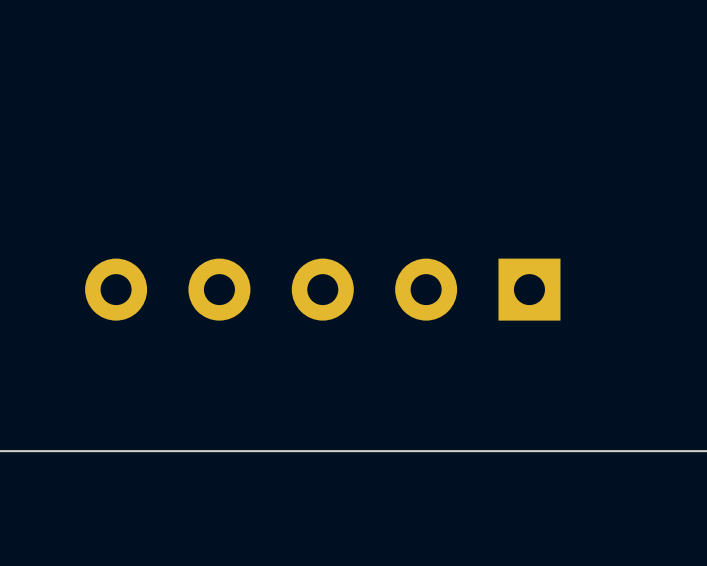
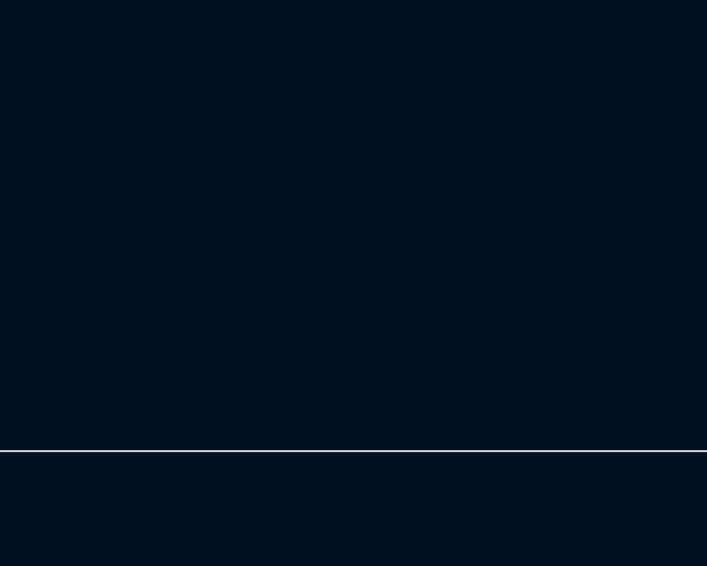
part: (322, 289) -> none

